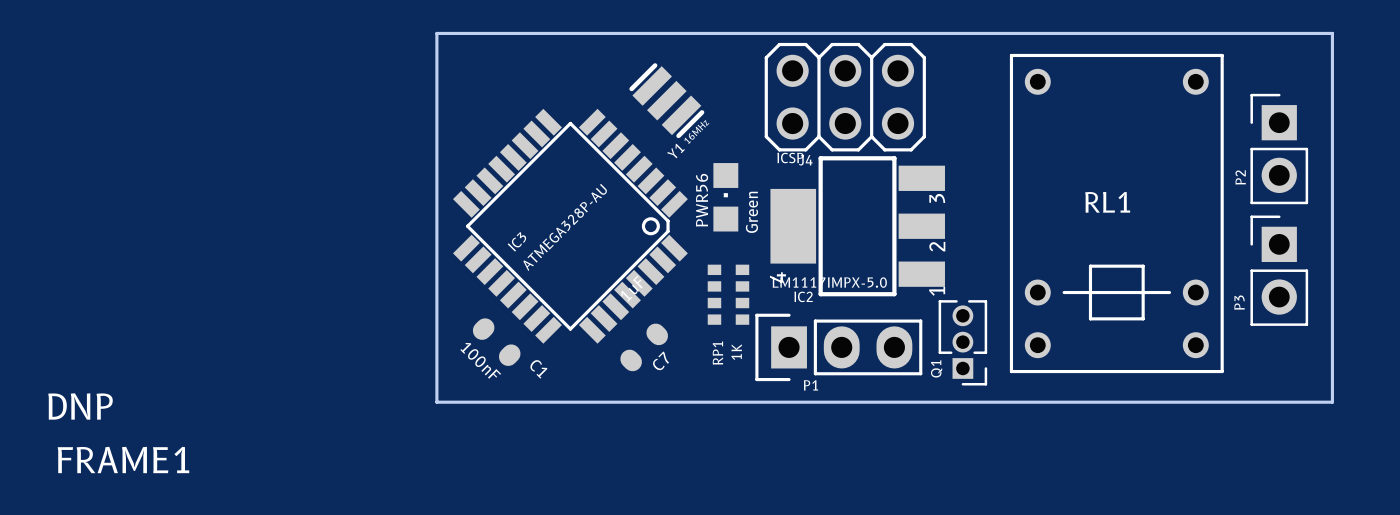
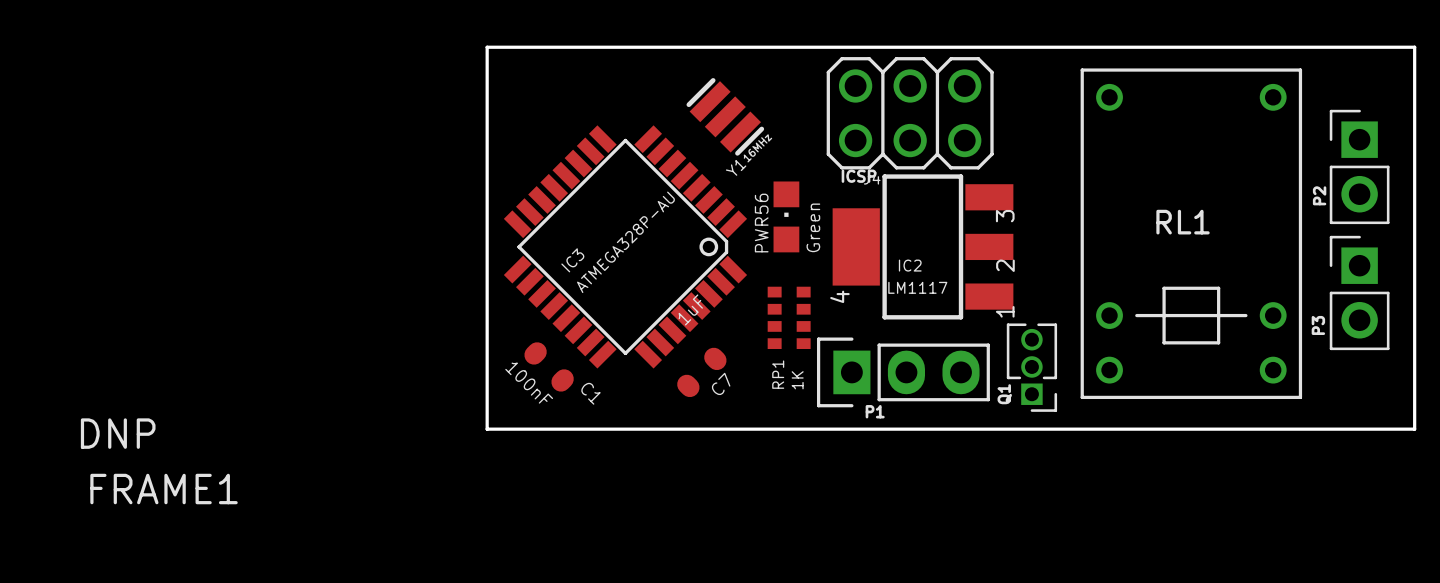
IC2 value: LM1117IMPX-5.0 (829, 282) -> LM1117 (917, 287)
IC2 name position: IC2 (803, 296) -> IC2 (910, 265)

